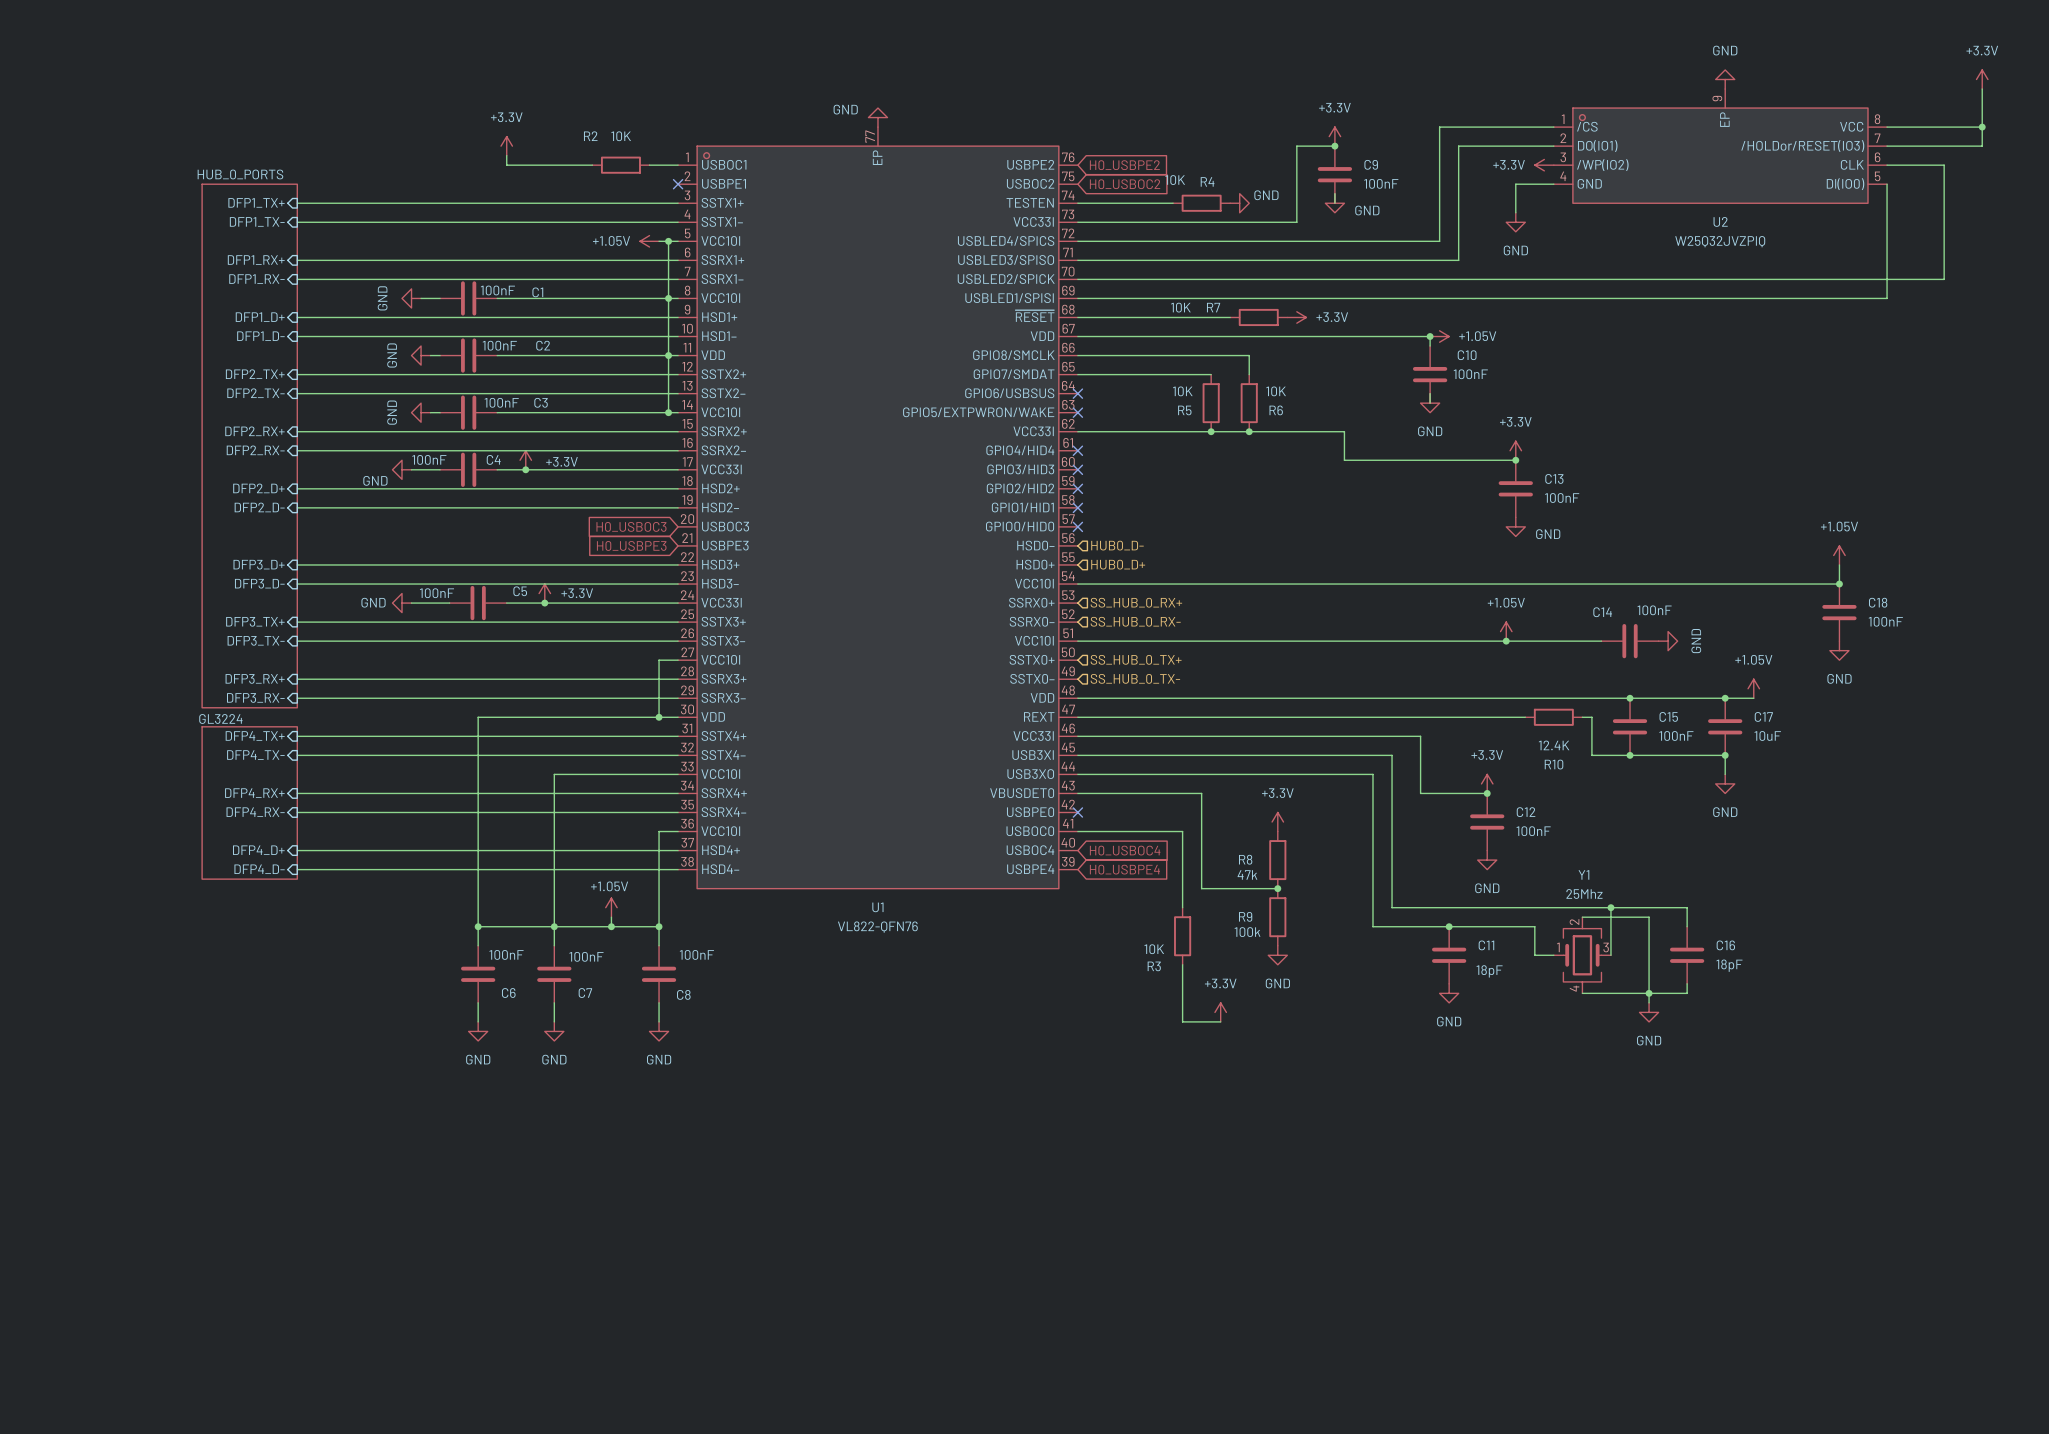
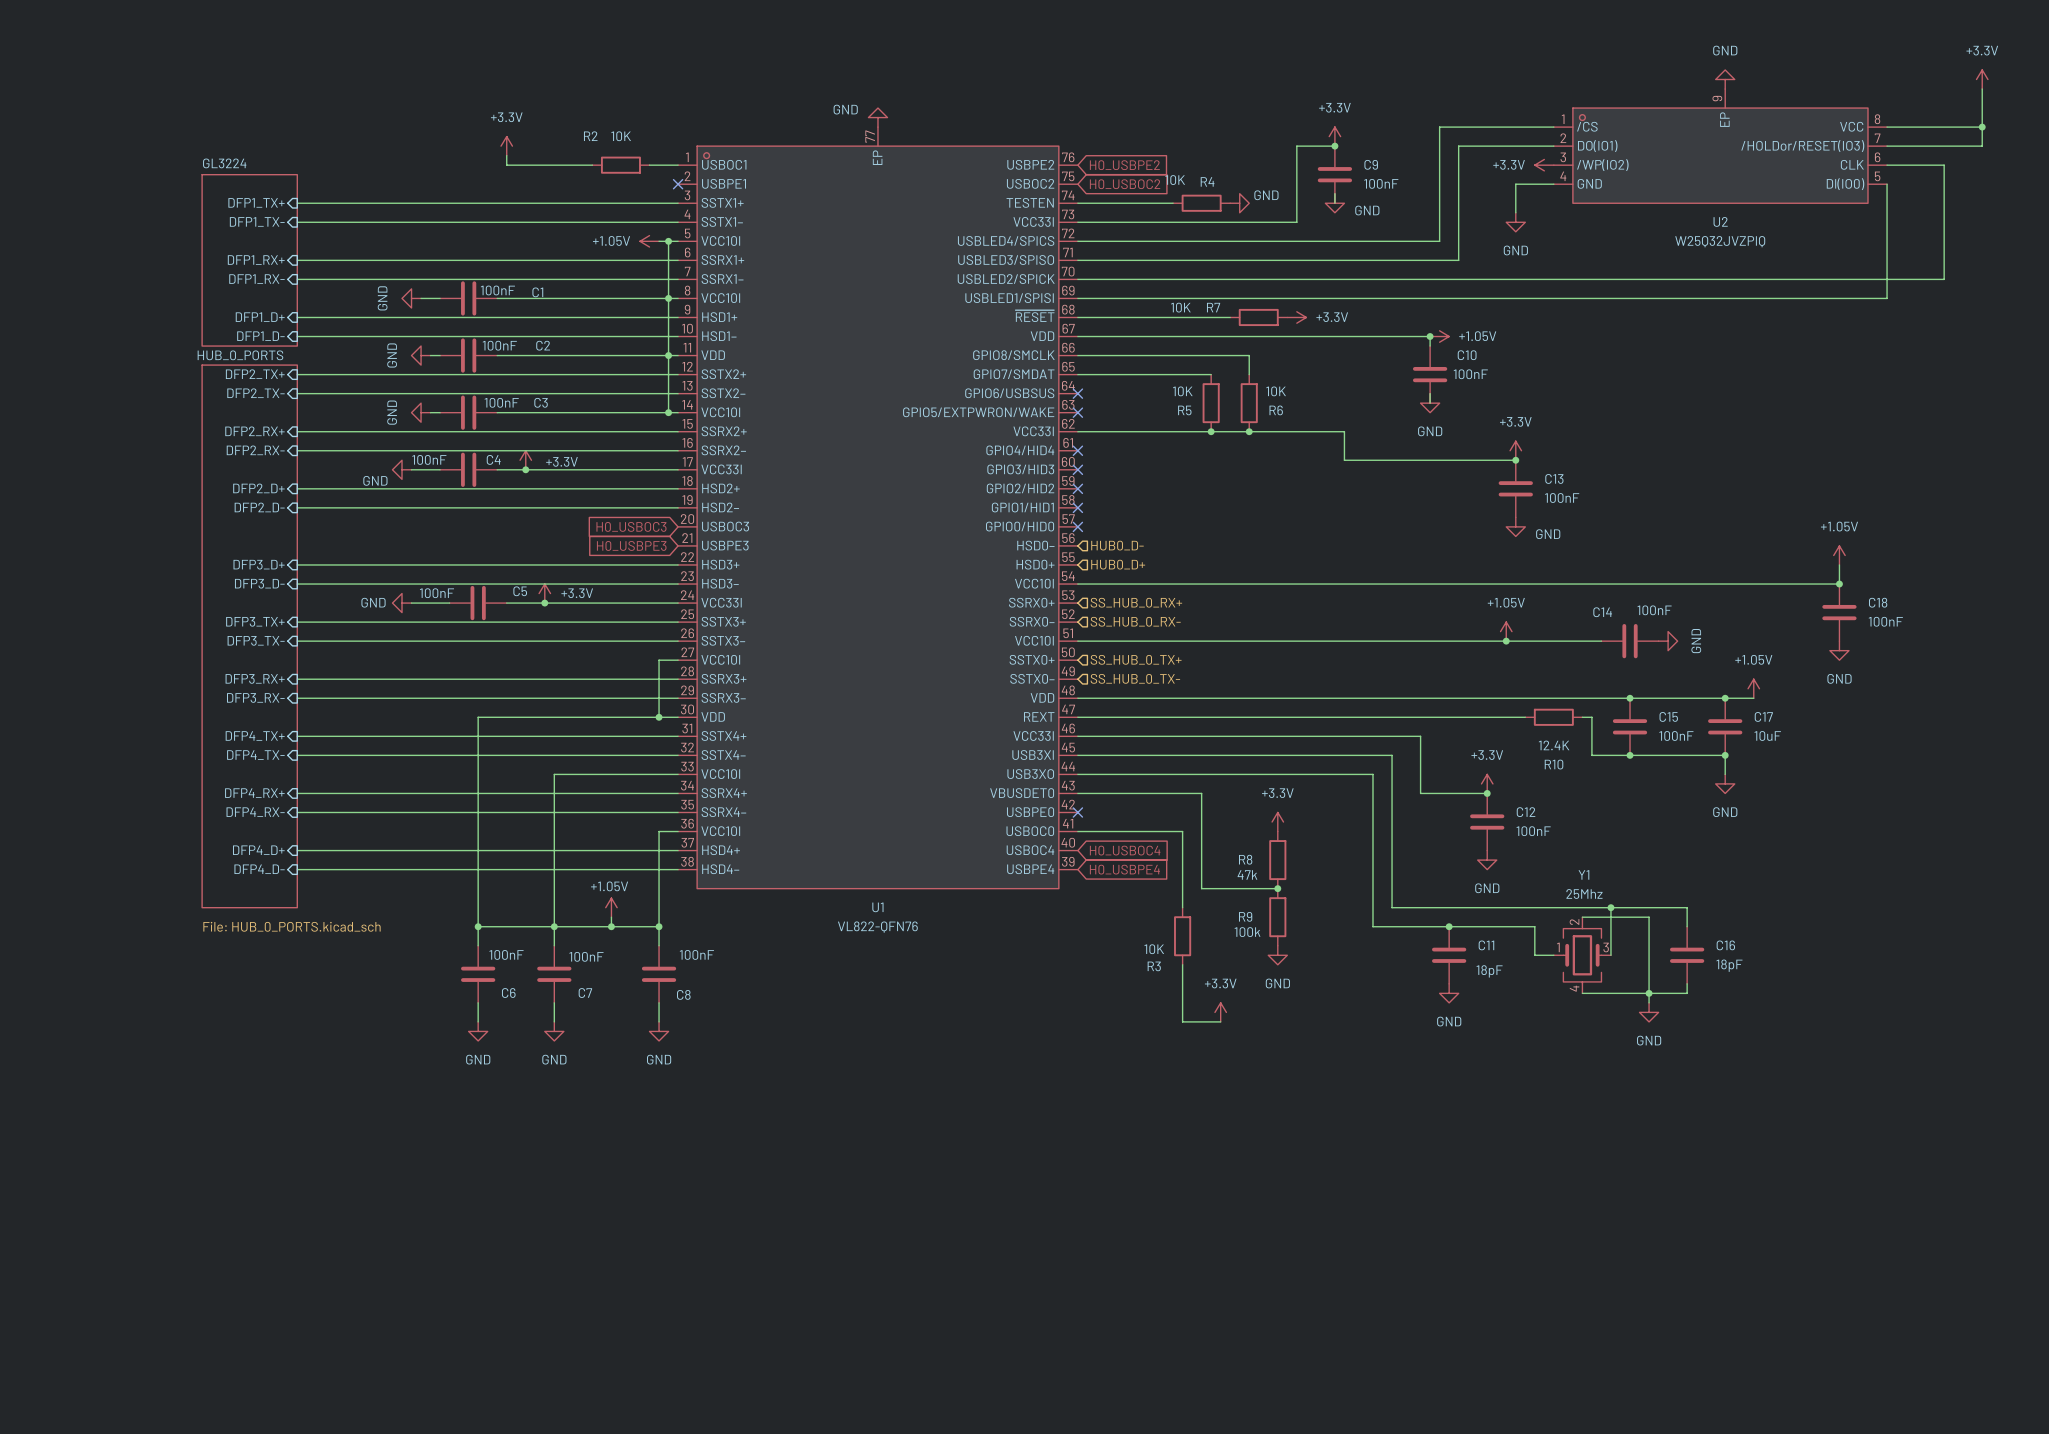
sheet HUB_0_PORTS shape: [201, 183, 298, 709] -> [201, 364, 298, 909]
sheet GL3224 shape: [201, 726, 298, 880] -> [201, 174, 298, 347]
sheet HUB_0_PORTS value: none -> File: HUB_0_PORTS.kicad_sch (292, 926)

